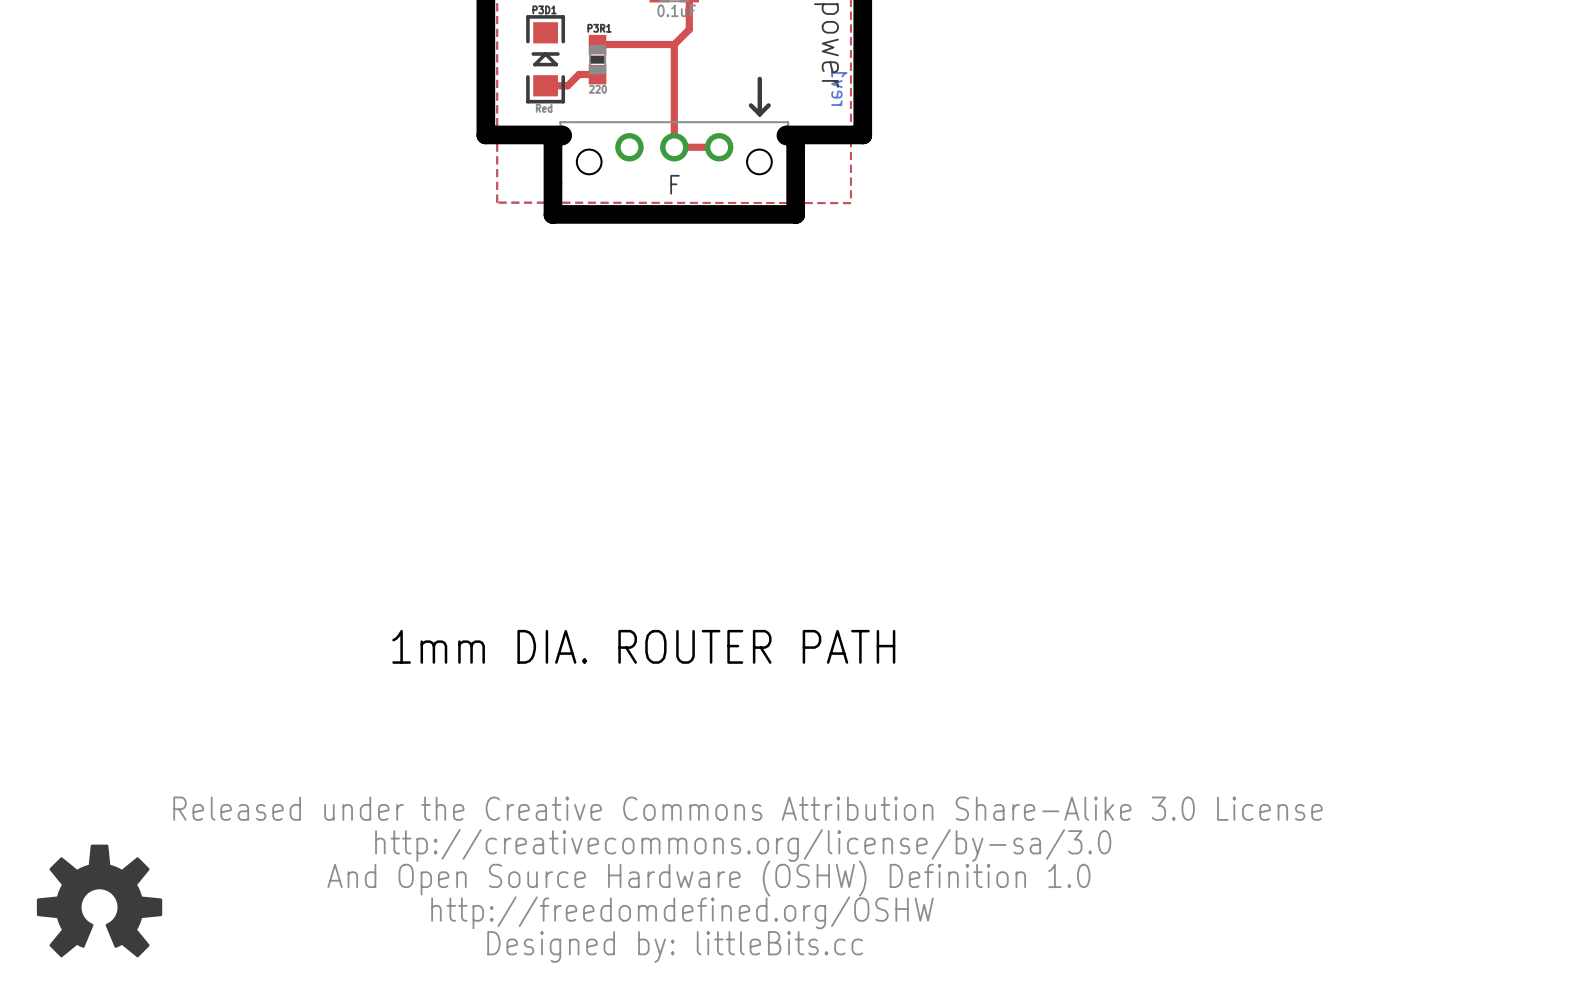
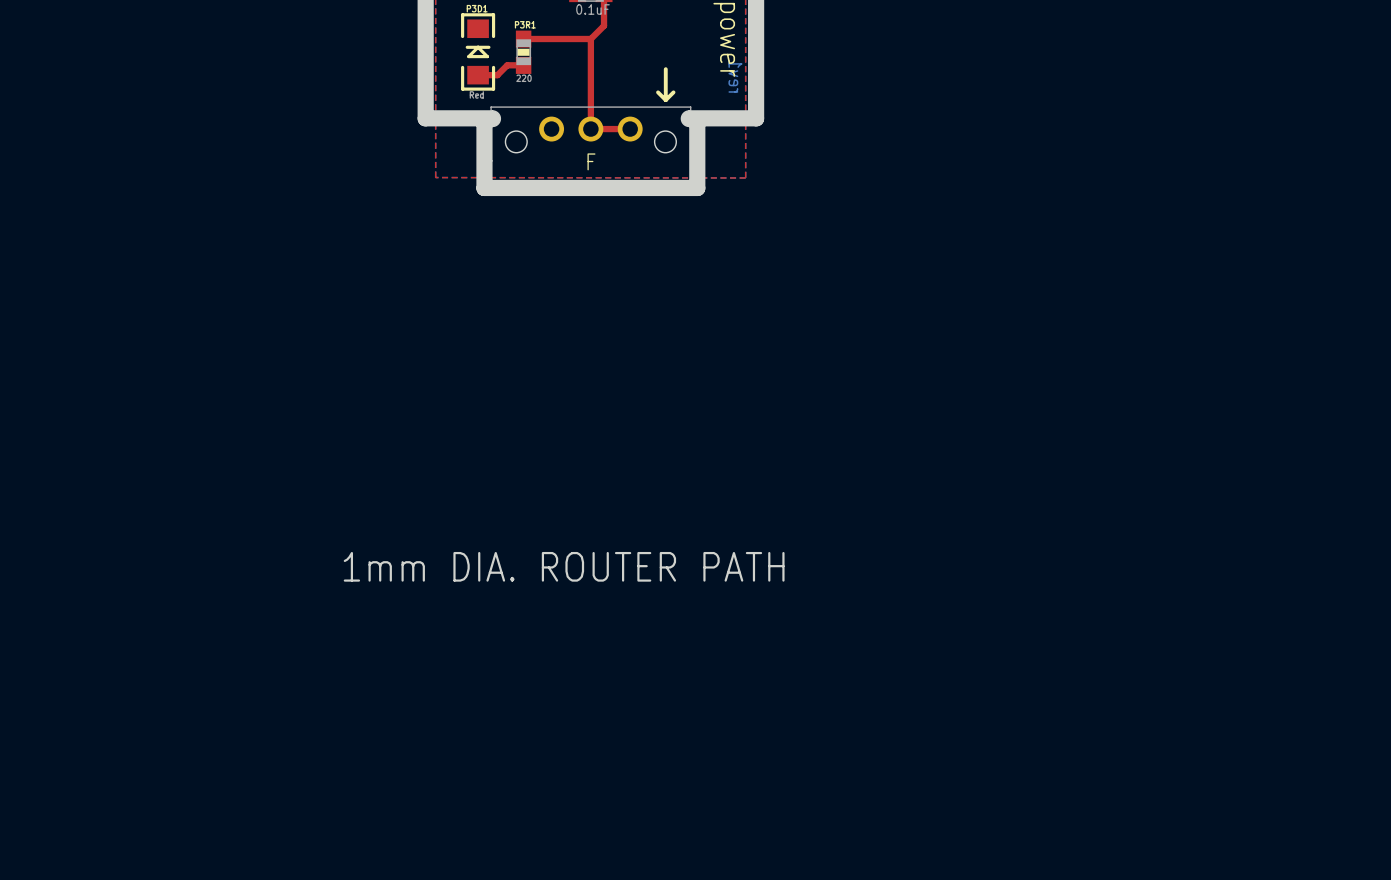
drawing: [36, 844, 163, 958] -> none

